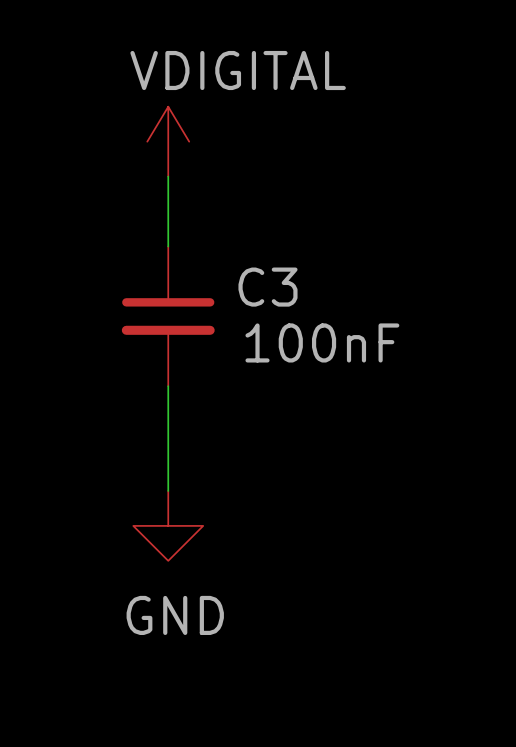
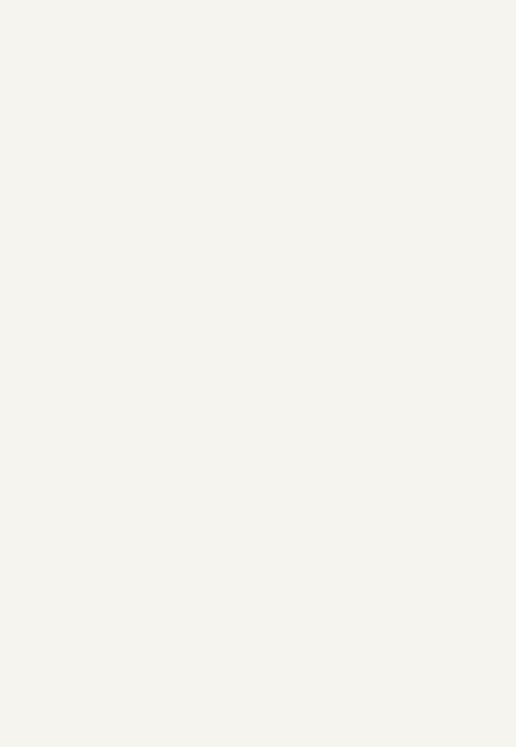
power symbol: VDIGITAL (168, 141) -> none
wire: (168, 176) (168, 246) -> none
C3: 100nF (168, 316) -> none
wire: (168, 386) (168, 490) -> none
power symbol: GND (168, 525) -> none

